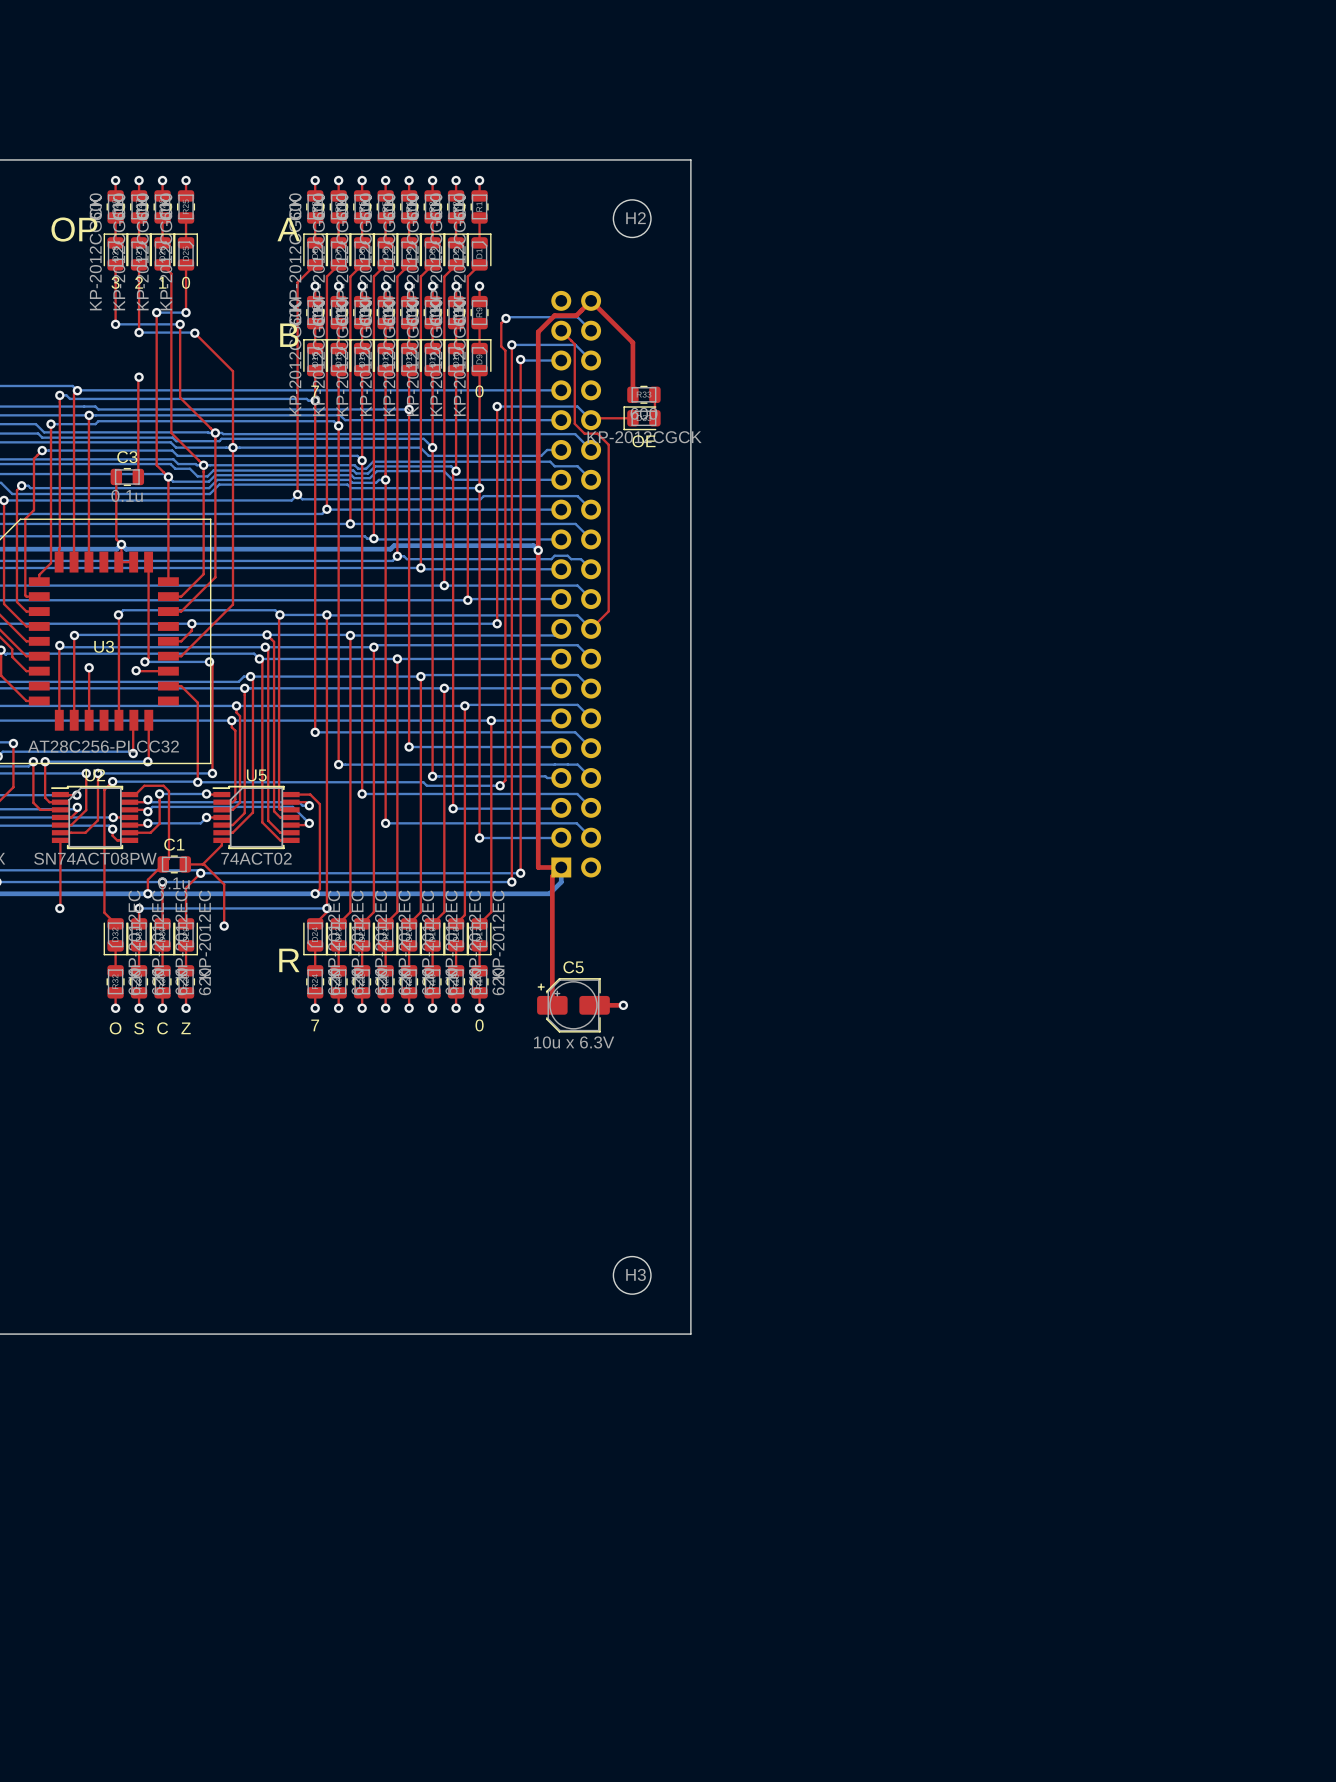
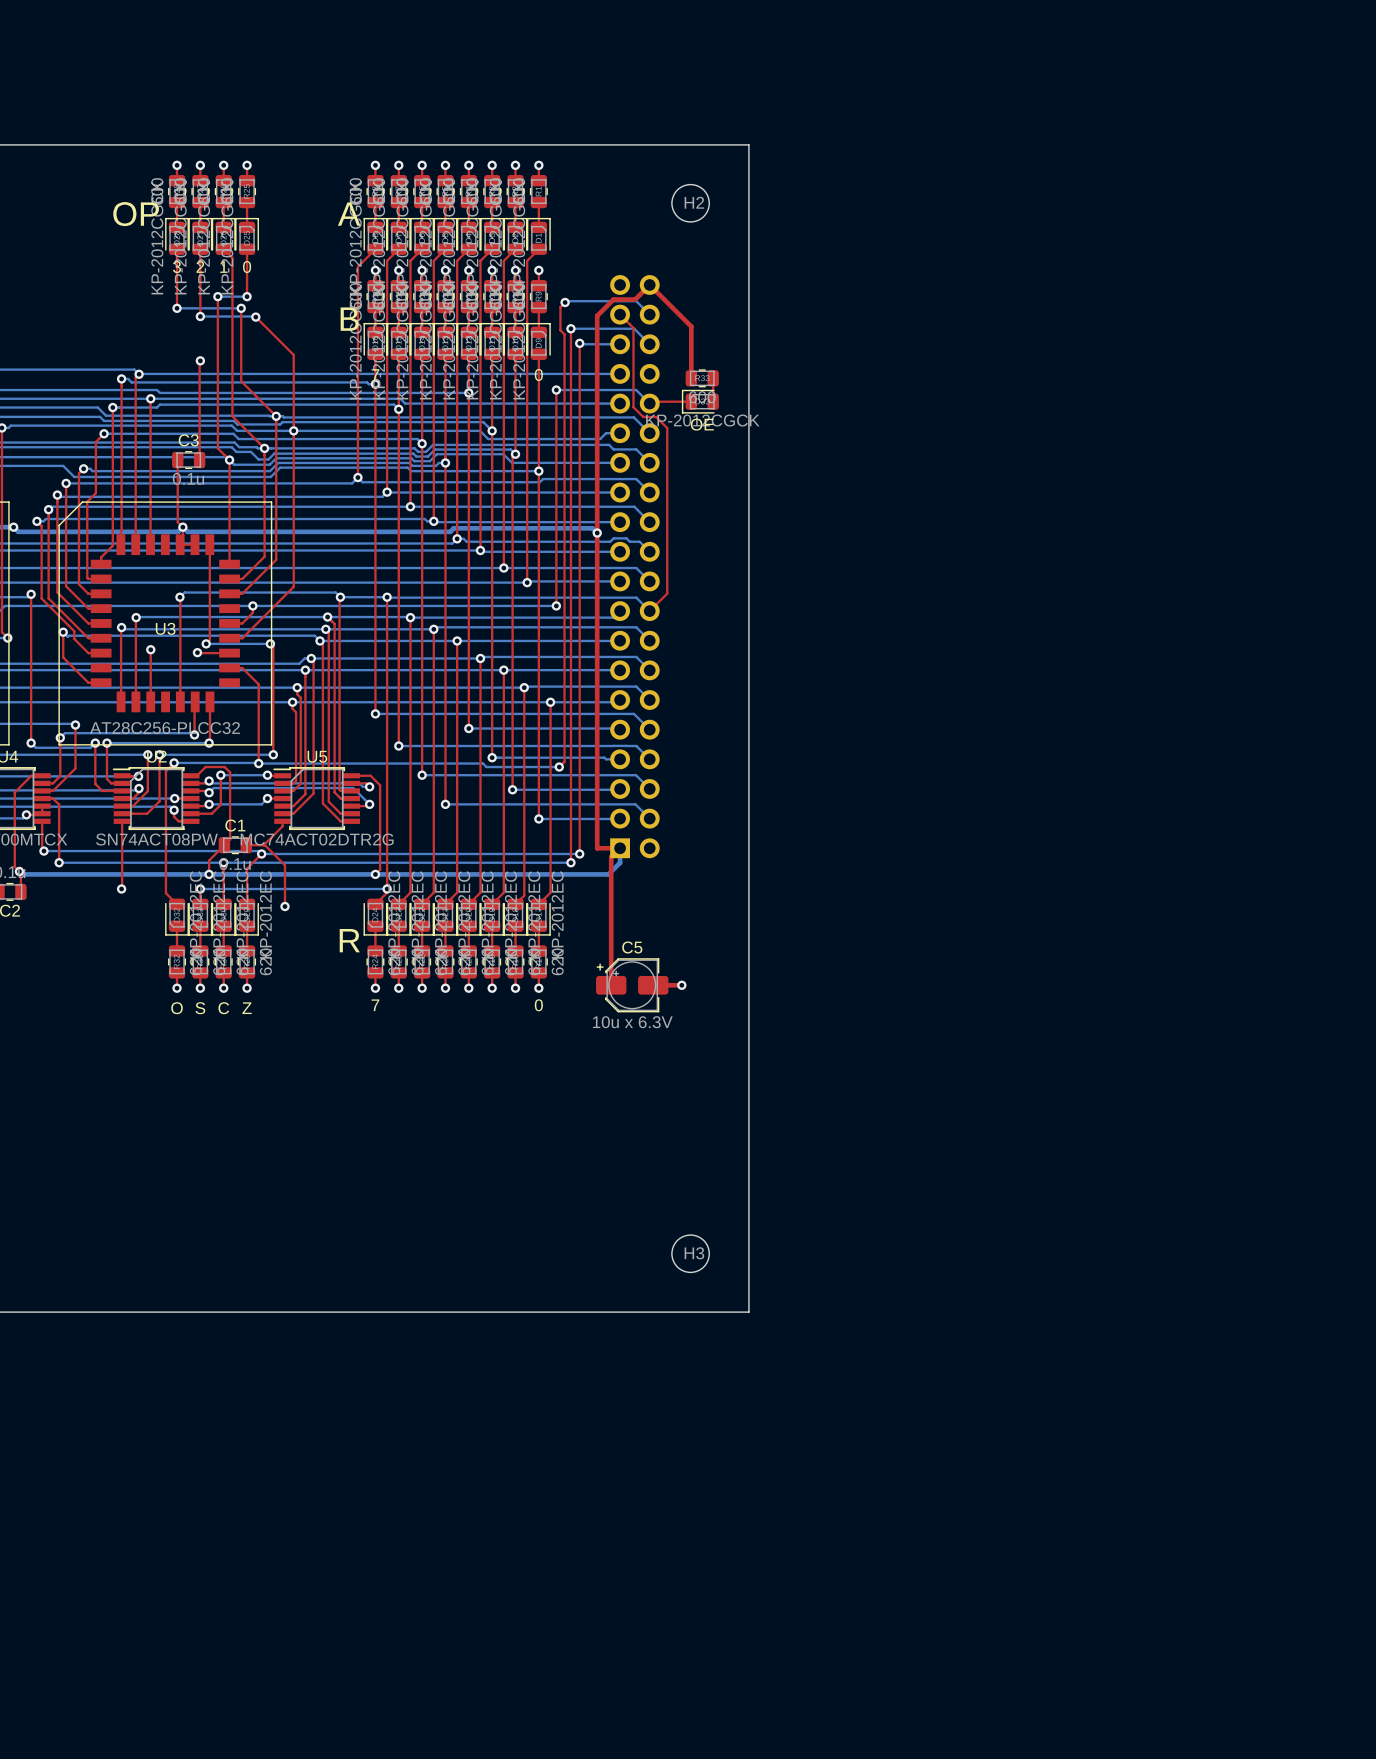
U5 value: 74ACT02 (256, 858) -> MC74ACT02DTR2G (317, 839)

